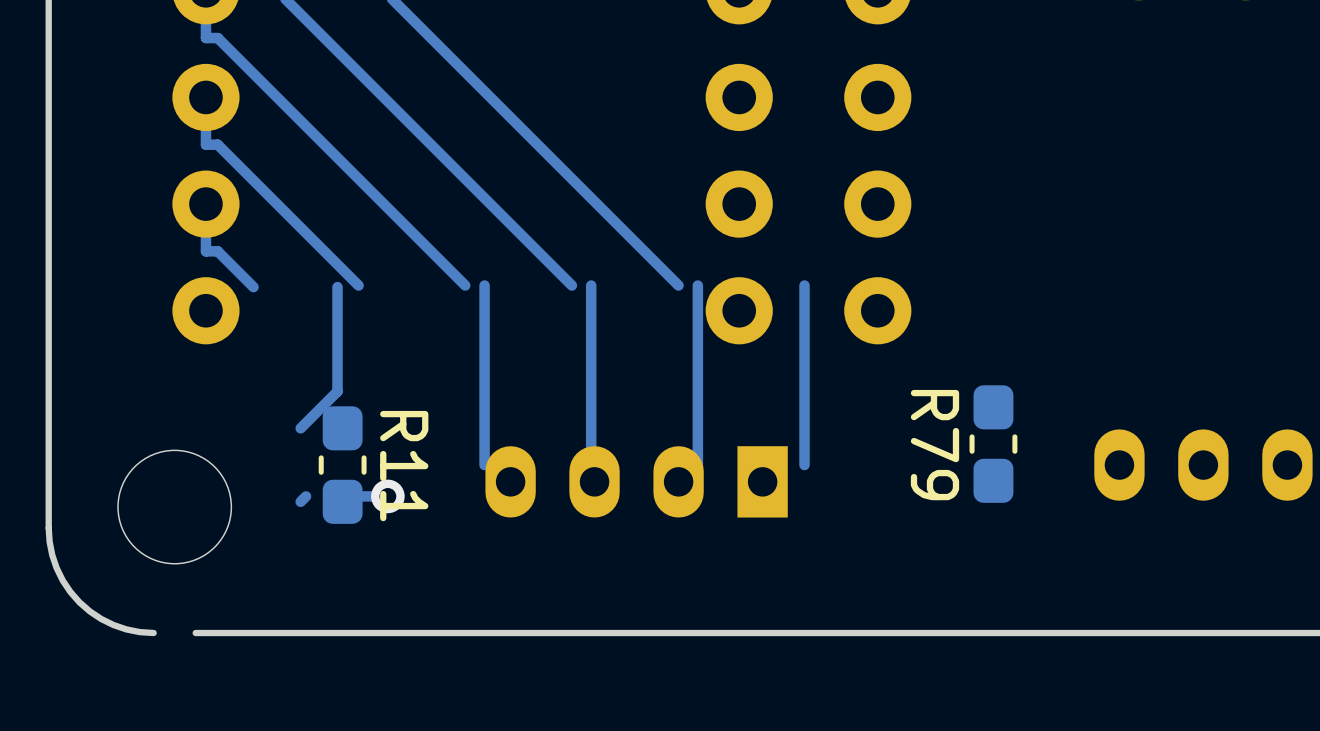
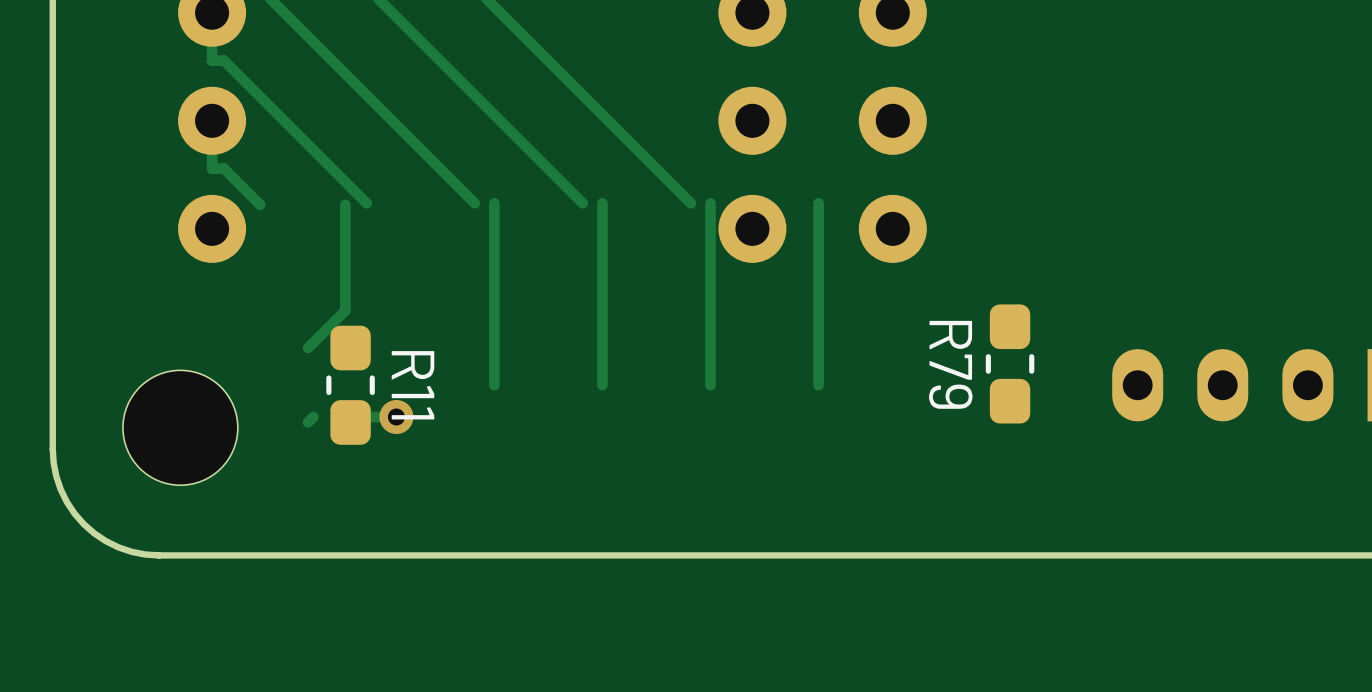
part: (636, 481) -> none
board edge: none -> (201, 555) (159, 555)

